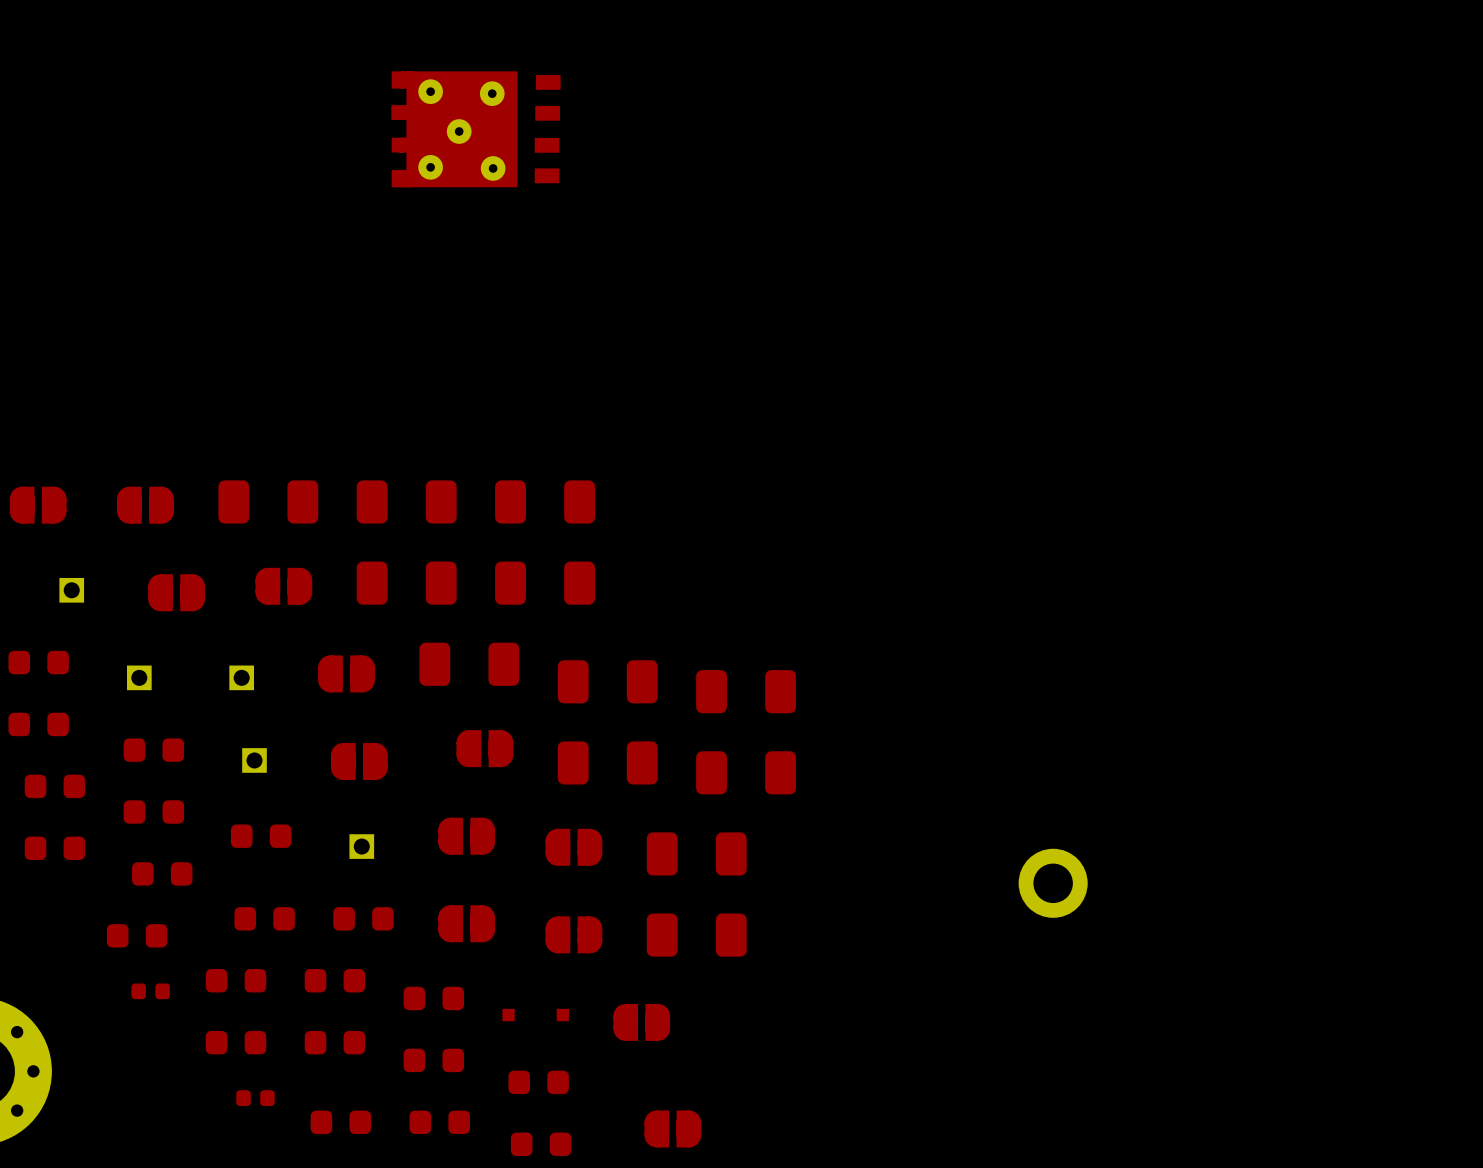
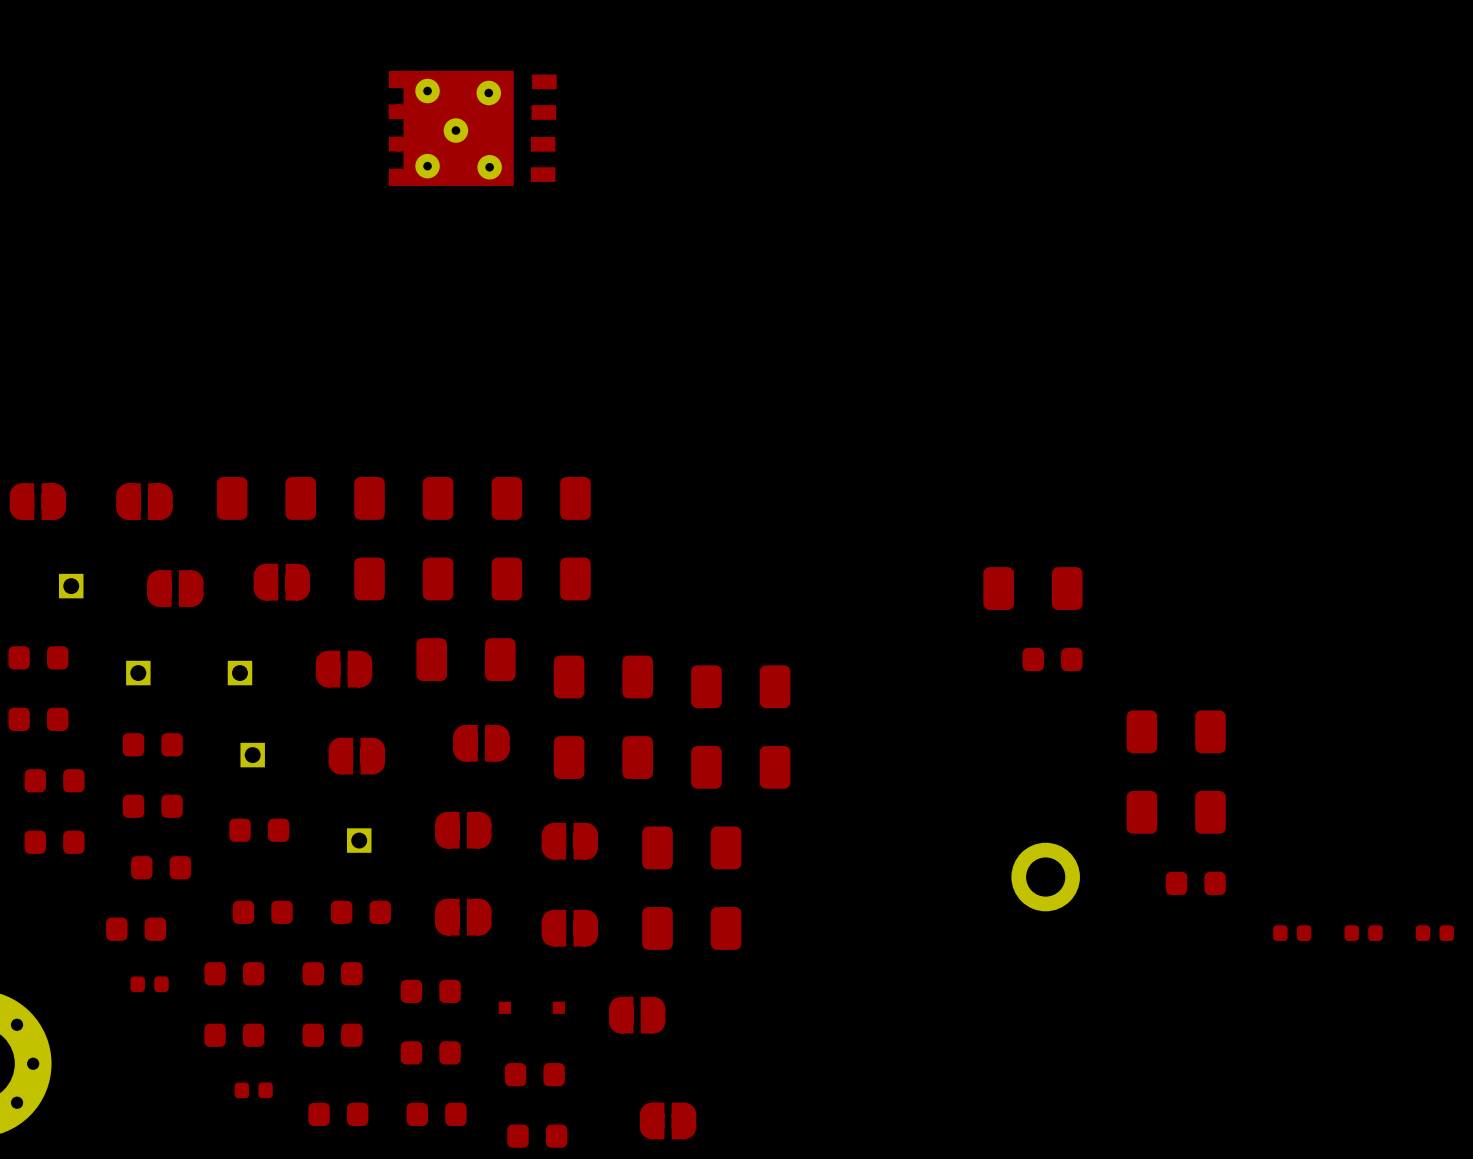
part: none -> (1032, 588)
part: none -> (1052, 659)
part: none -> (1176, 731)
part: none -> (1176, 812)
part: none -> (1195, 883)
part: none -> (1292, 933)
part: none -> (1363, 933)
part: none -> (1434, 933)

